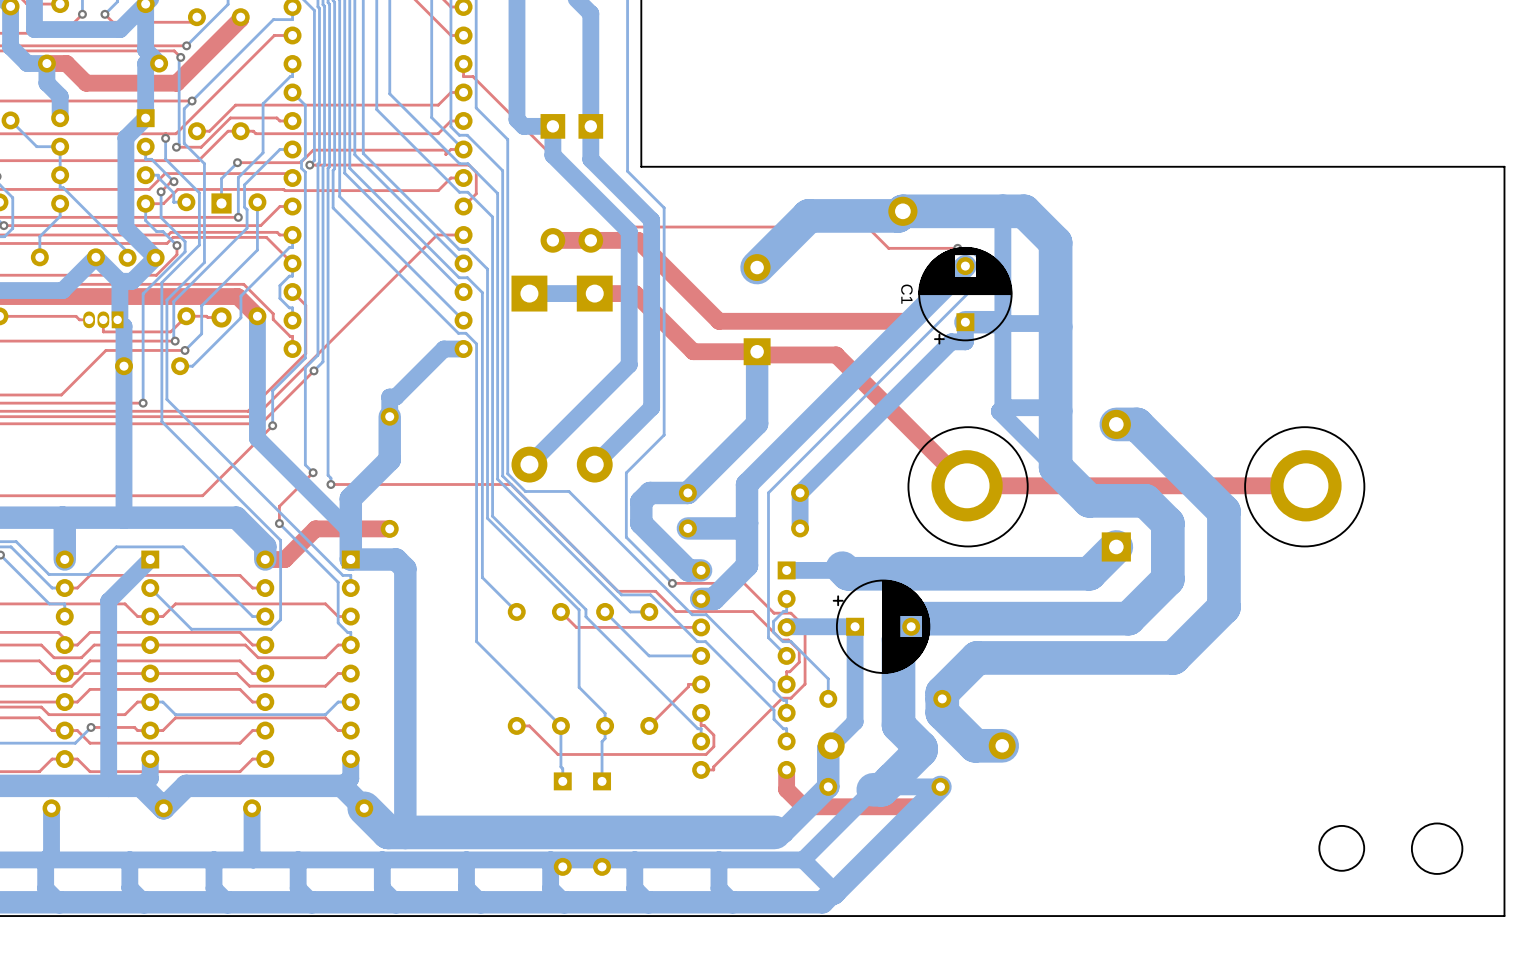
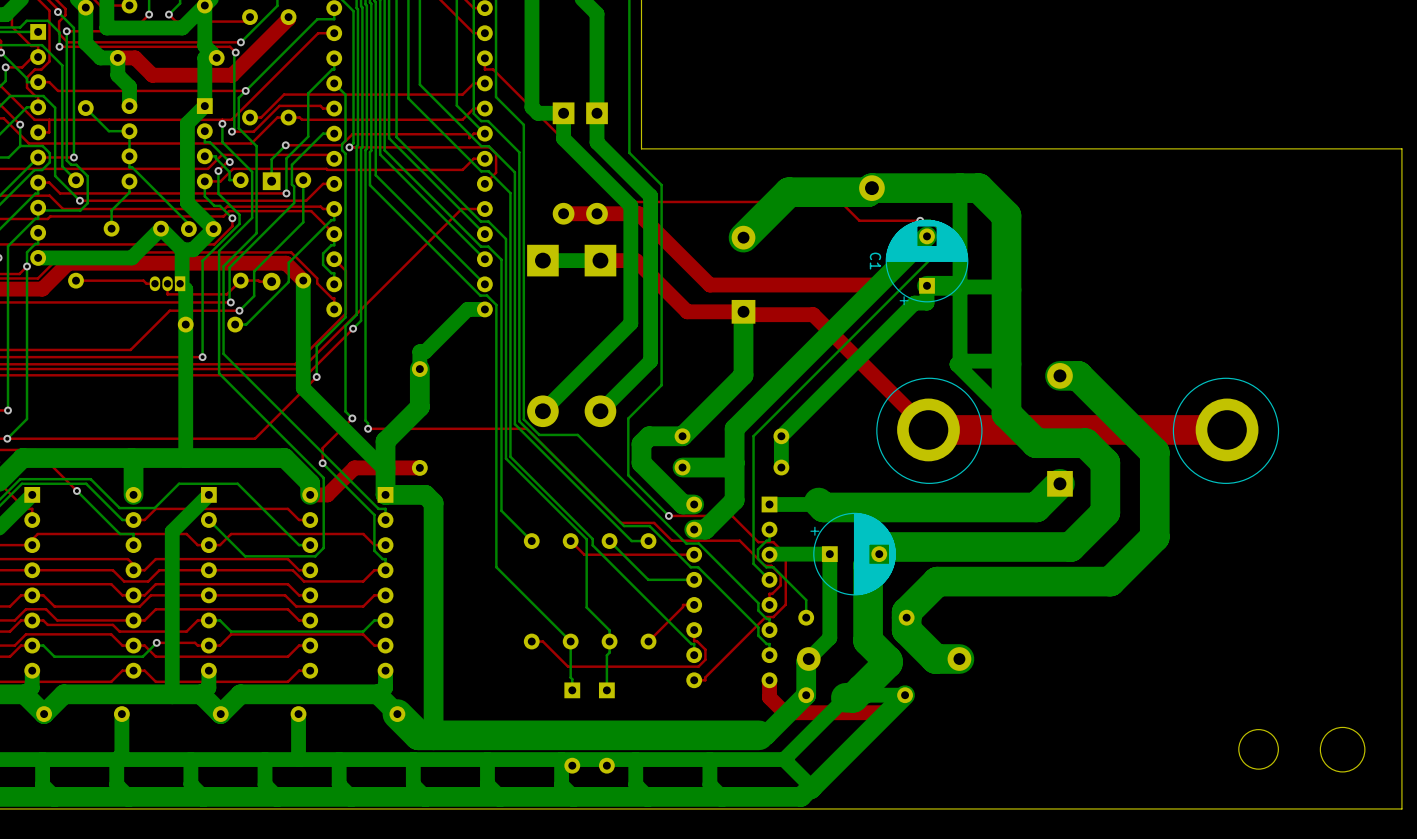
top track width: thin (1305, 485) (967, 485) -> thick (1227, 429) (928, 429)

